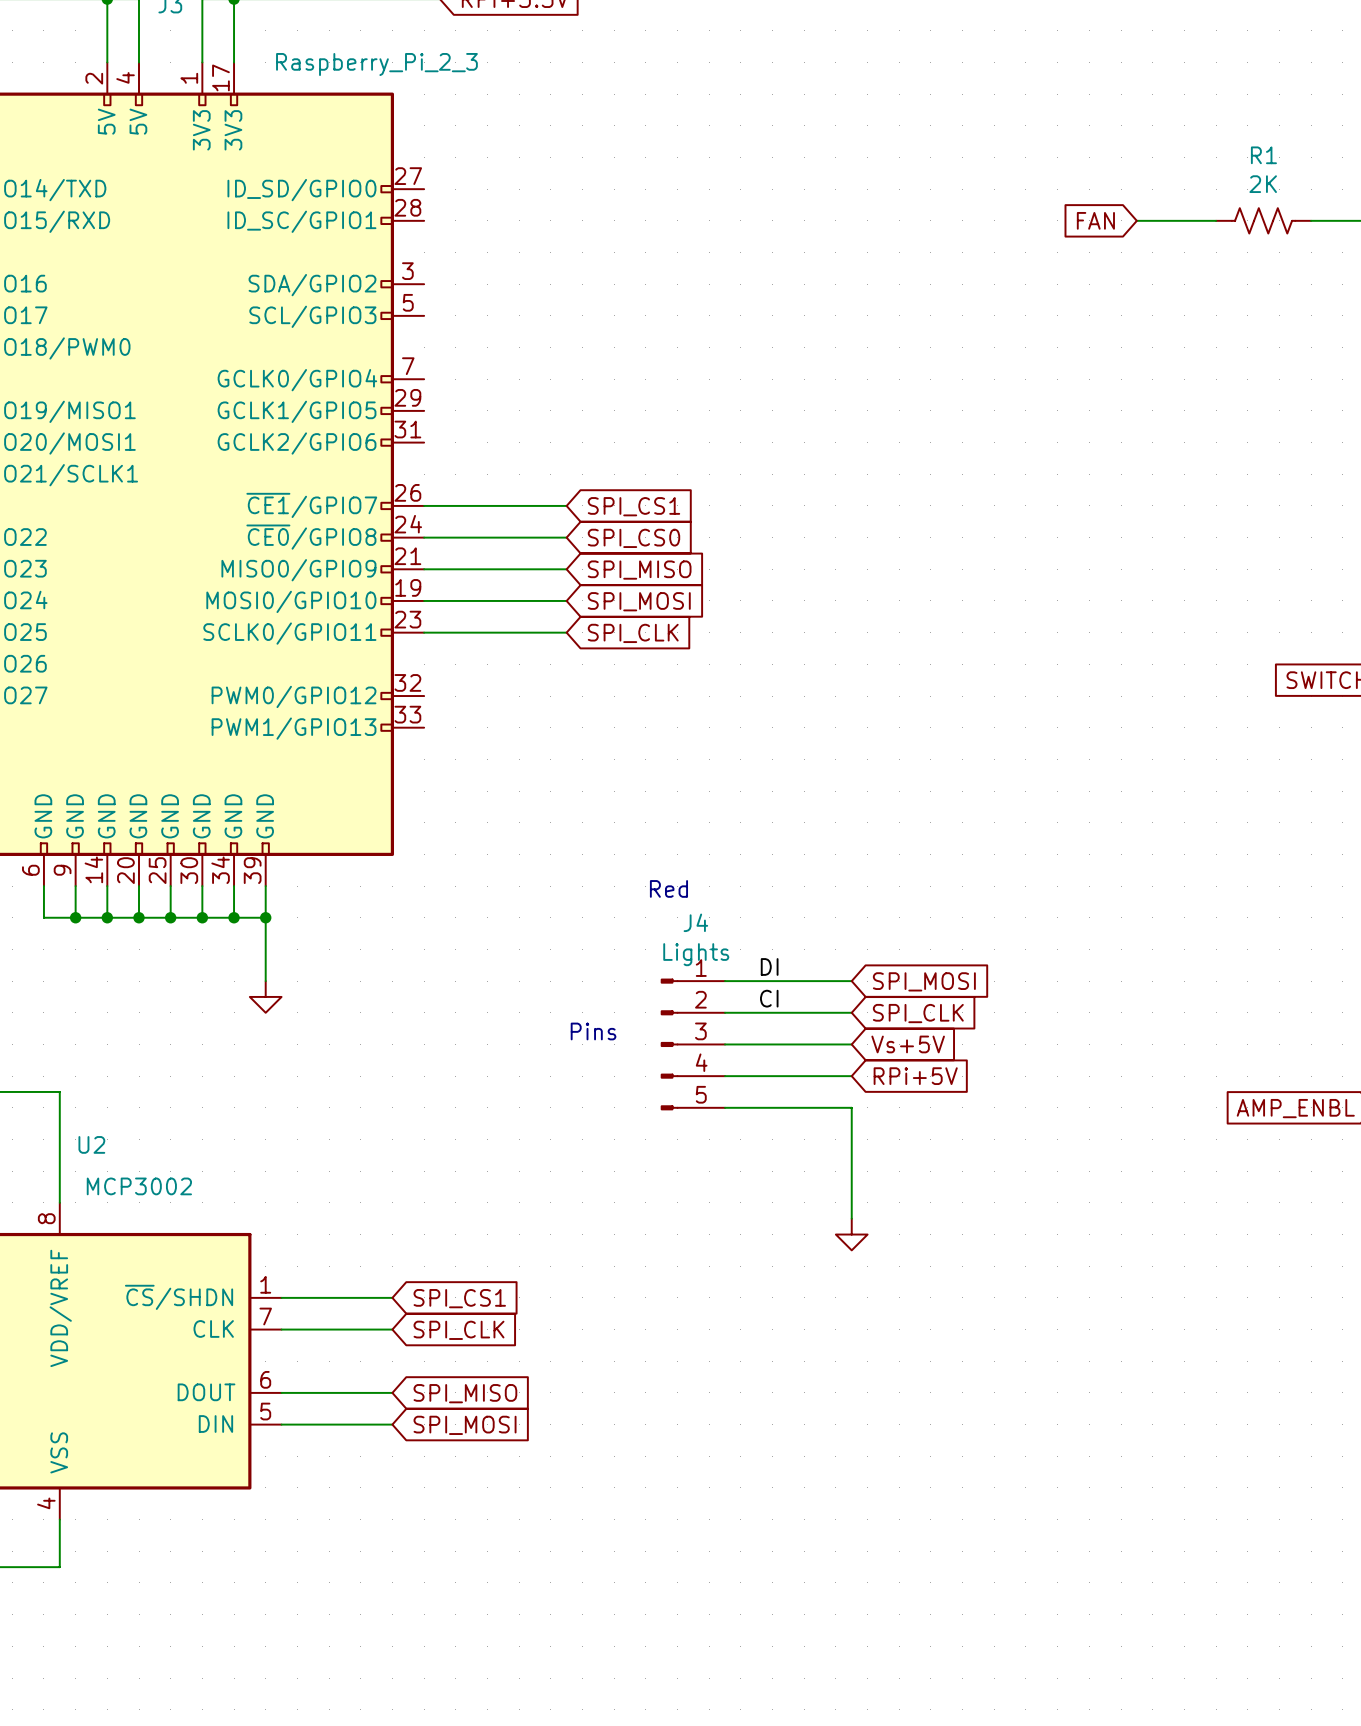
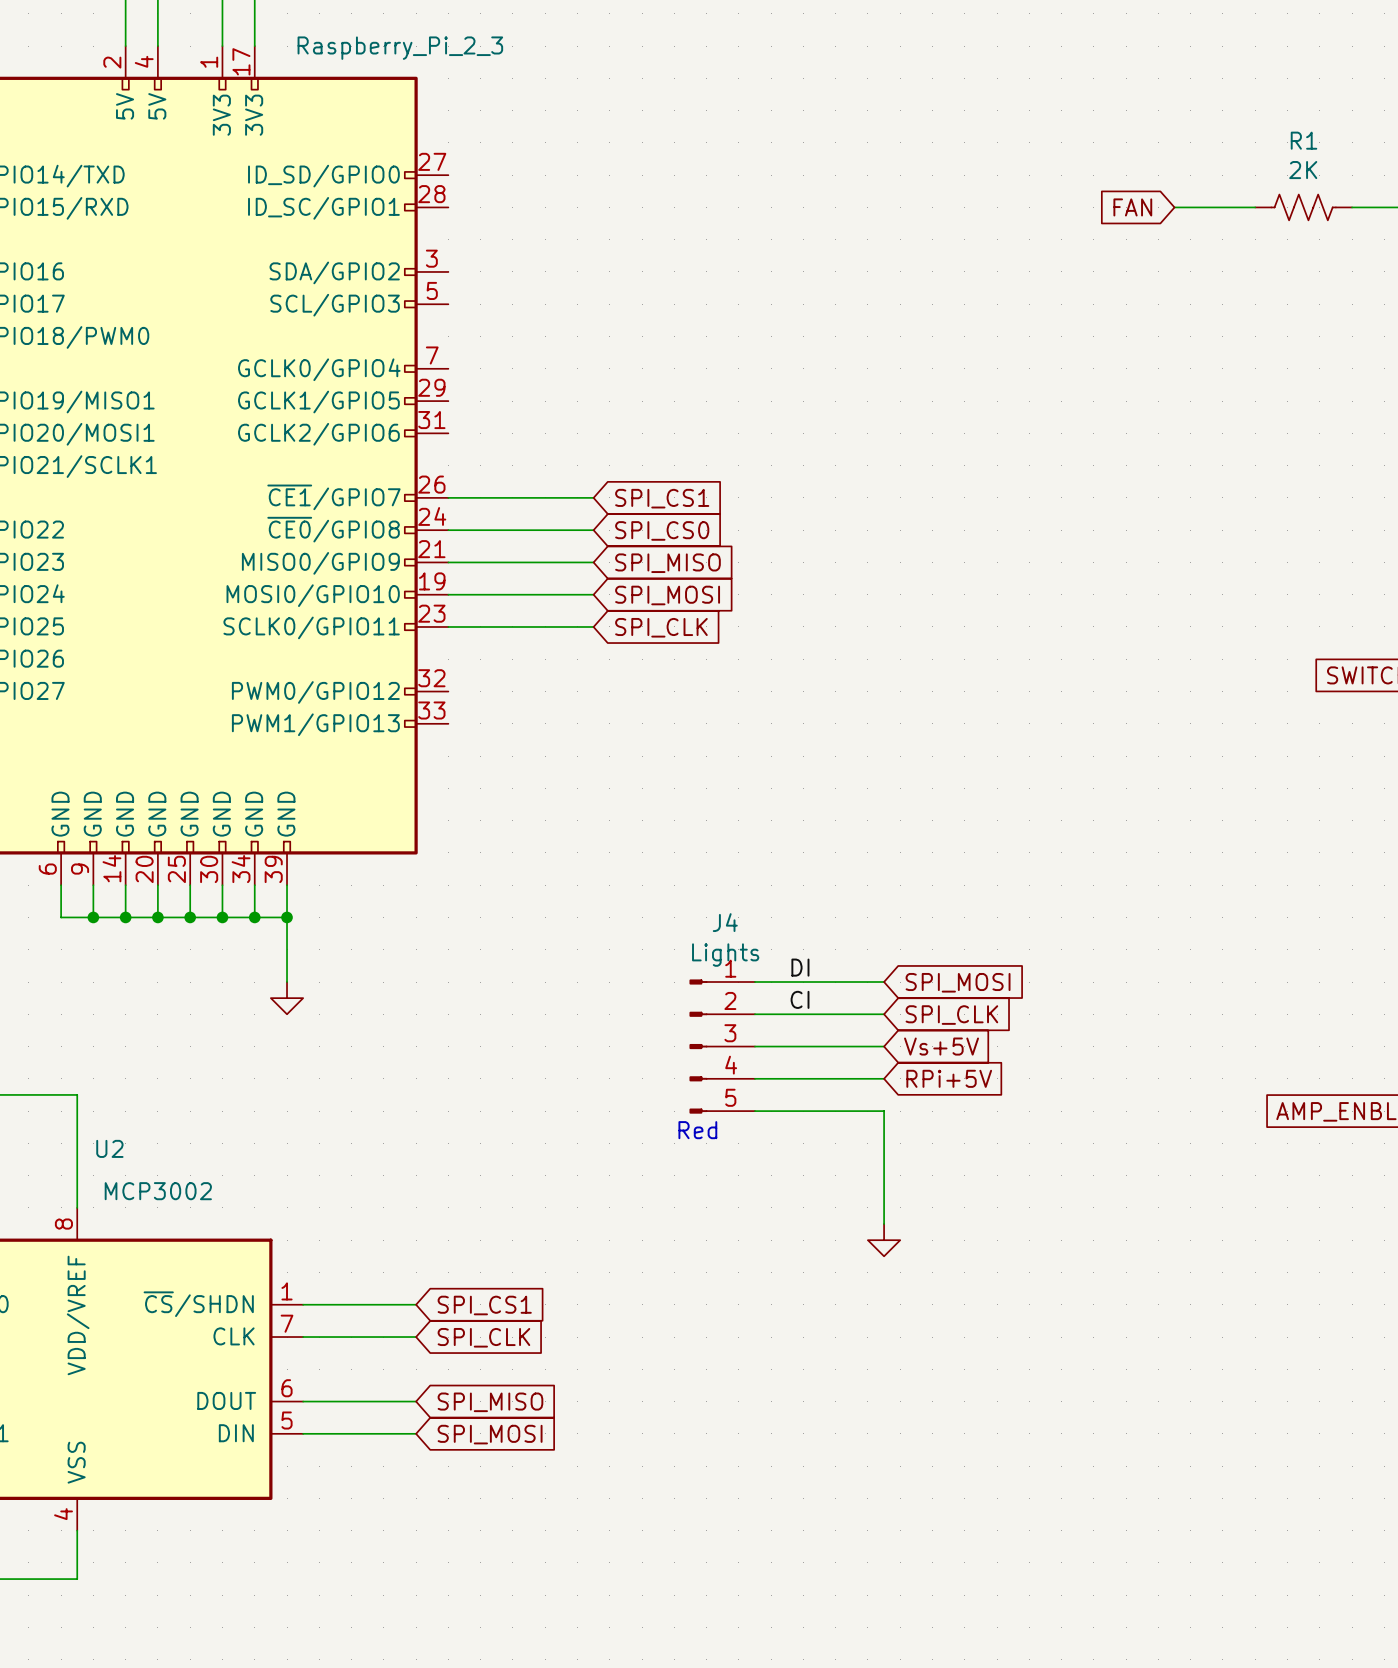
text position: Red (668, 888) -> Red (697, 1130)
text: Pins (593, 1031) -> none

